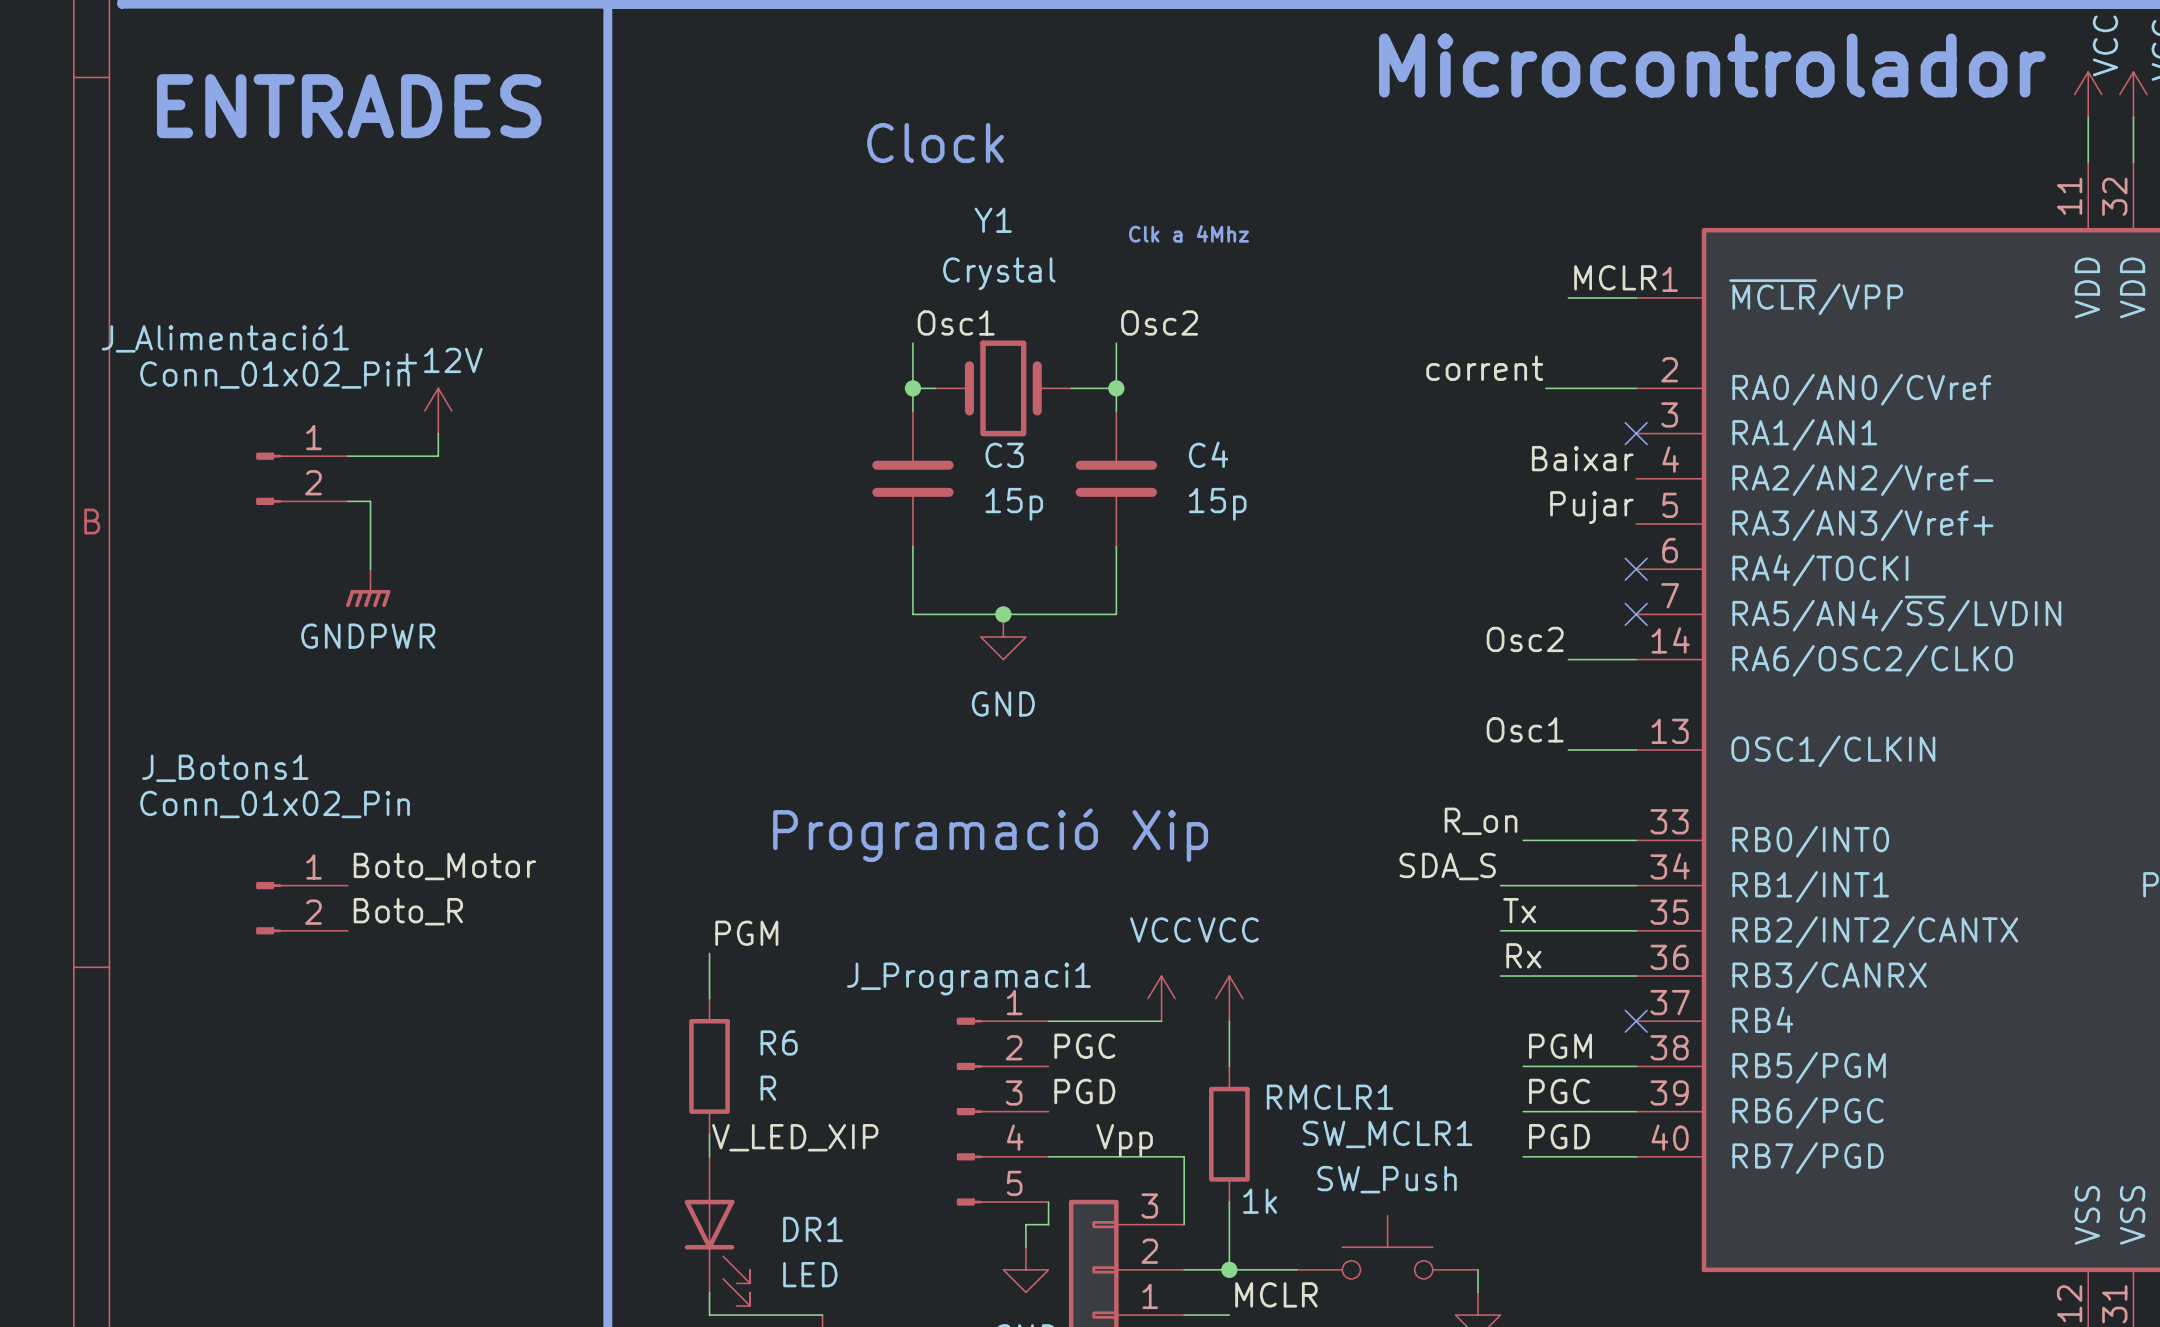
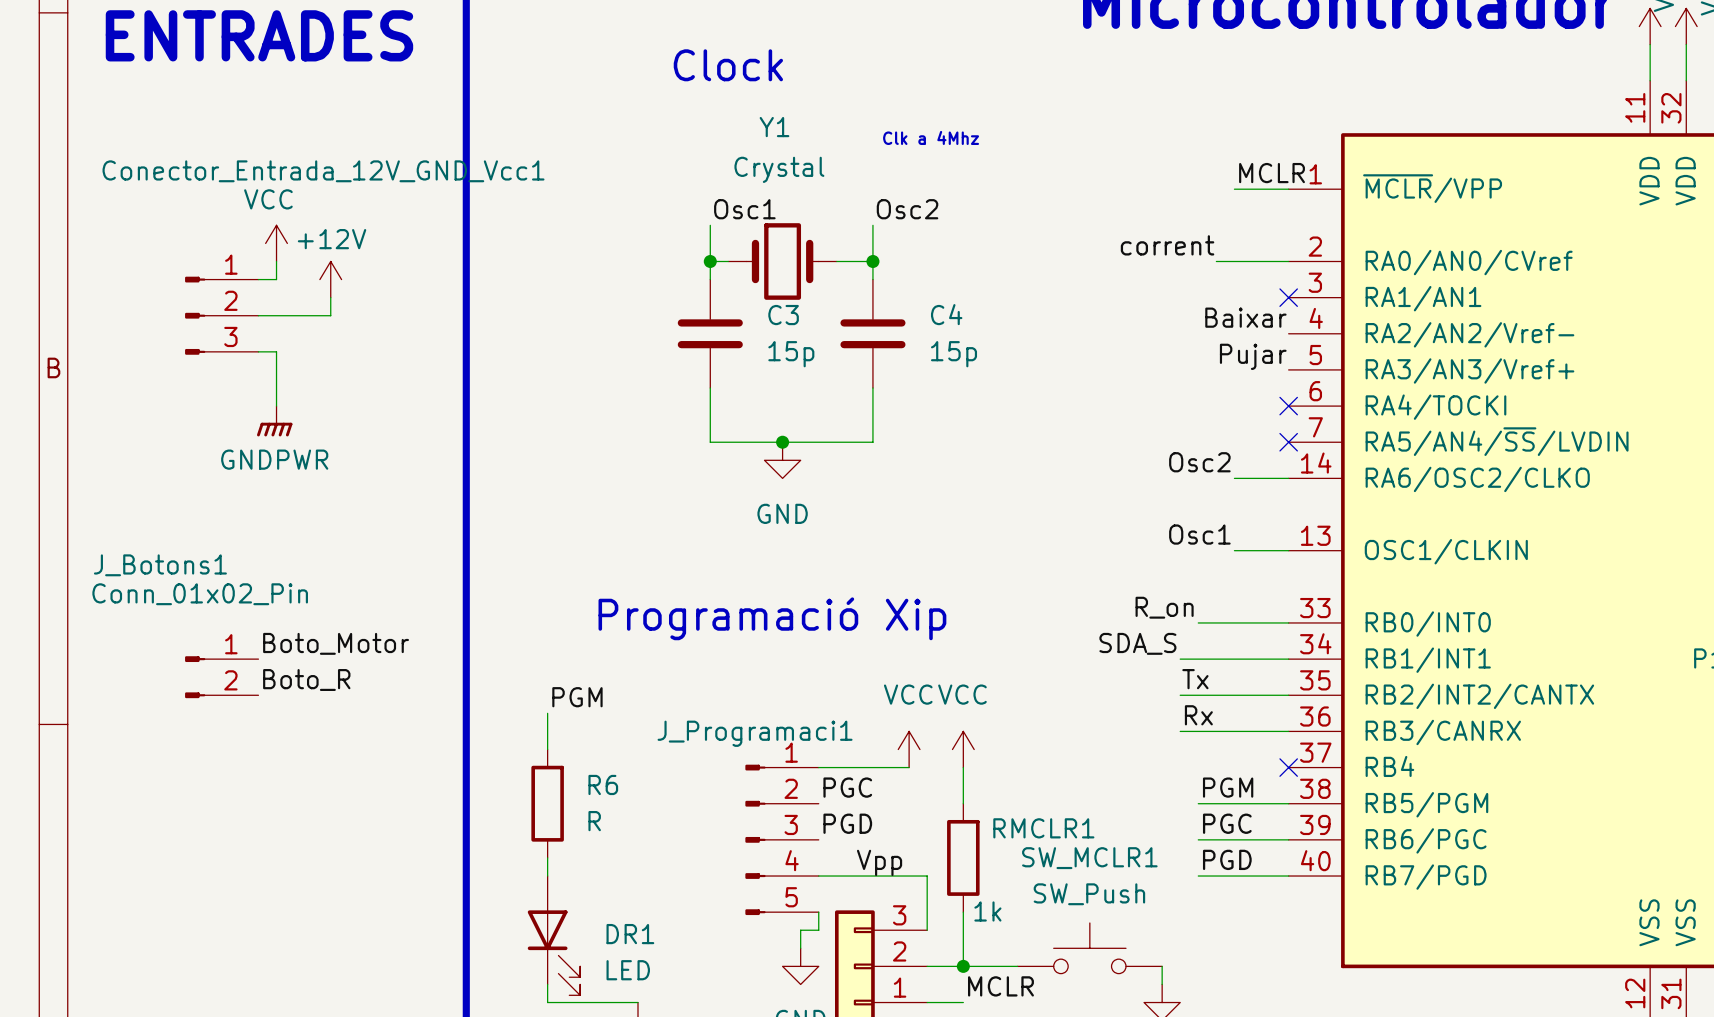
power symbol: none -> VCC (276, 243)
wire: none -> (276, 261) (276, 279) (258, 279)
Conector_Entrada_12V_GND_Vcc1: none -> (221, 315)
J_Alimentació1: Conn_01x02_Pin (302, 478) -> none
label: V_LED_XIP (795, 1137) -> none

